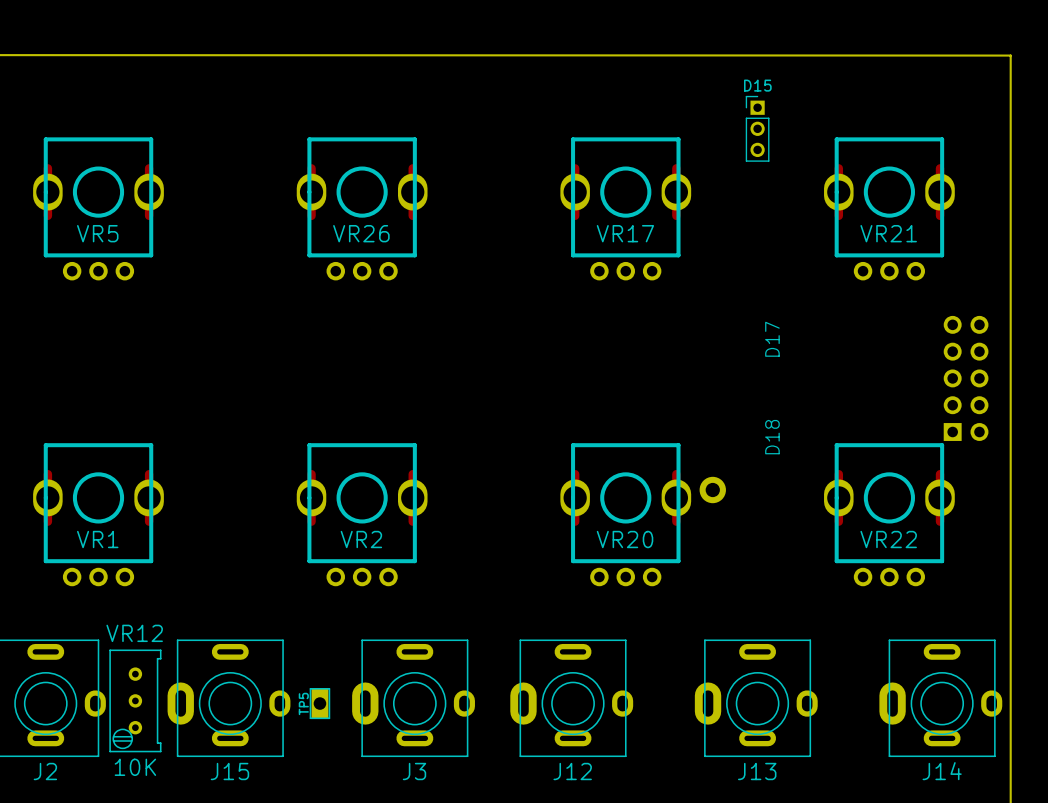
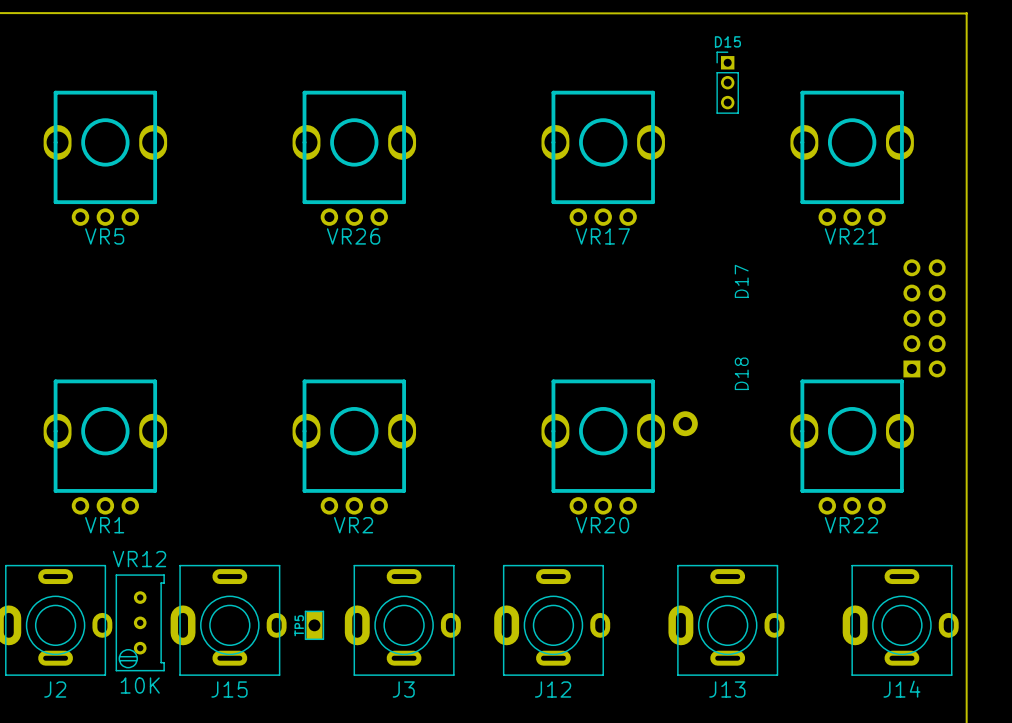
VR5 footprint: [33, 137, 164, 281] -> [43, 90, 168, 226]
VR26 footprint: [296, 137, 428, 281] -> [292, 90, 417, 226]
VR17 footprint: [560, 137, 692, 281] -> [541, 90, 665, 226]
VR21 footprint: [824, 137, 955, 281] -> [790, 90, 914, 226]
VR5 name position: VR5 (97, 233) -> VR5 (104, 236)
VR26 name position: VR26 (361, 233) -> VR26 (353, 236)
VR17 name position: VR17 (625, 233) -> VR17 (602, 236)
VR21 name position: VR21 (888, 233) -> VR21 (851, 236)
VR1 footprint: [33, 443, 164, 587] -> [43, 379, 168, 515]
VR2 footprint: [296, 443, 428, 587] -> [292, 379, 417, 515]
VR20 footprint: [560, 443, 692, 587] -> [541, 379, 665, 515]
VR22 footprint: [824, 443, 955, 587] -> [790, 379, 914, 515]
VR1 name position: VR1 (97, 539) -> VR1 (104, 525)
VR2 name position: VR2 (361, 539) -> VR2 (353, 525)
VR20 name position: VR20 (625, 539) -> VR20 (602, 525)
VR22 name position: VR22 (888, 539) -> VR22 (851, 525)

